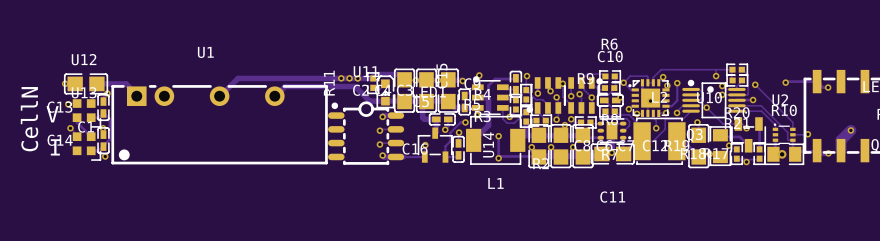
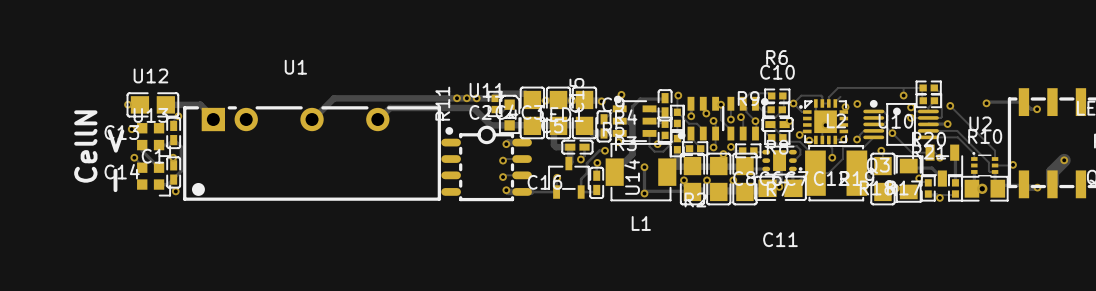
via: (663, 77) -> none
track: (677, 83) (677, 100) (671, 106) (665, 106) -> none

